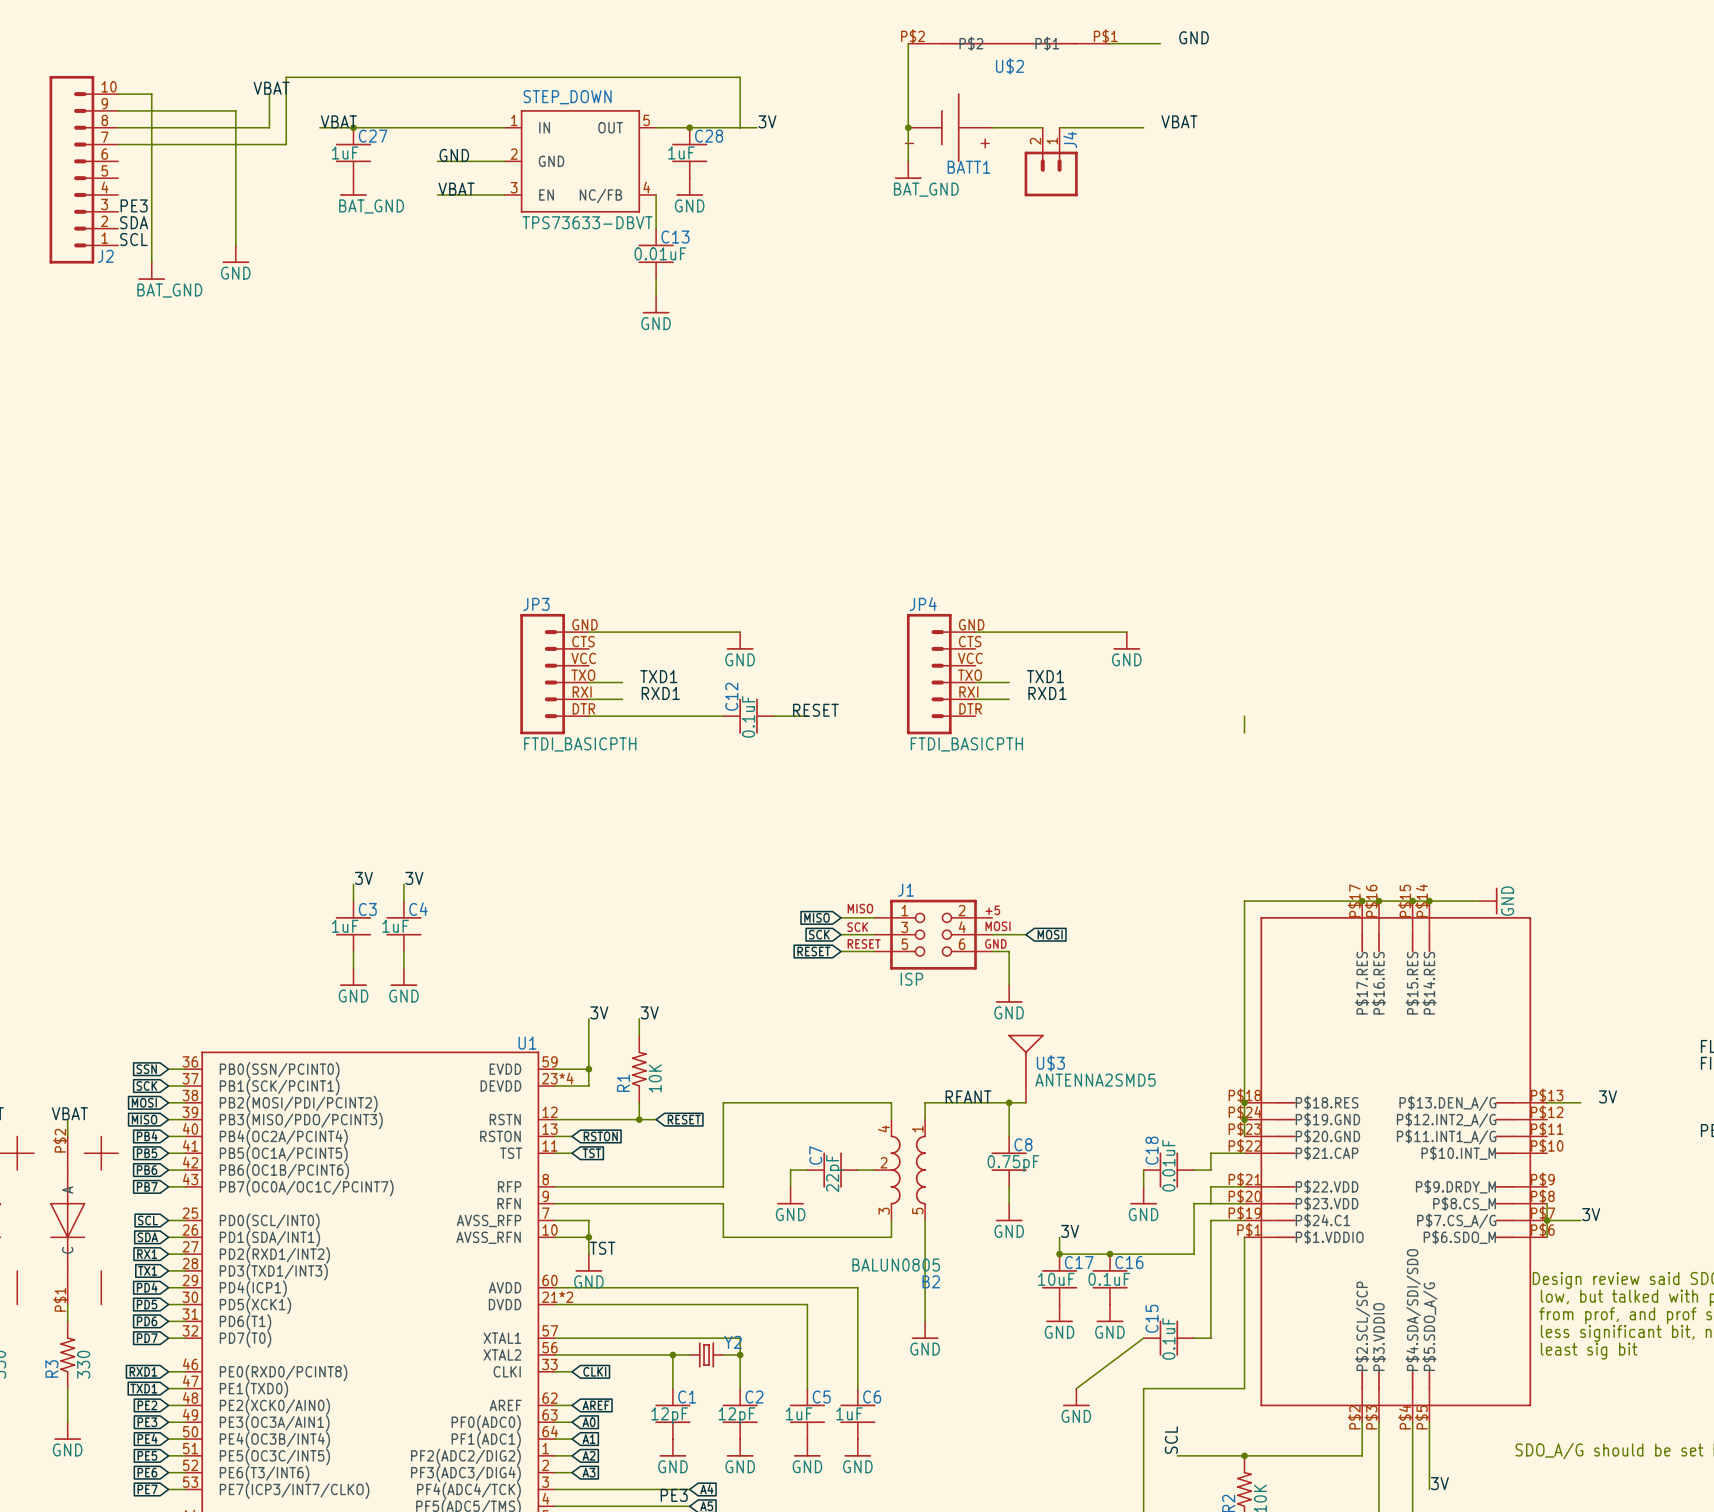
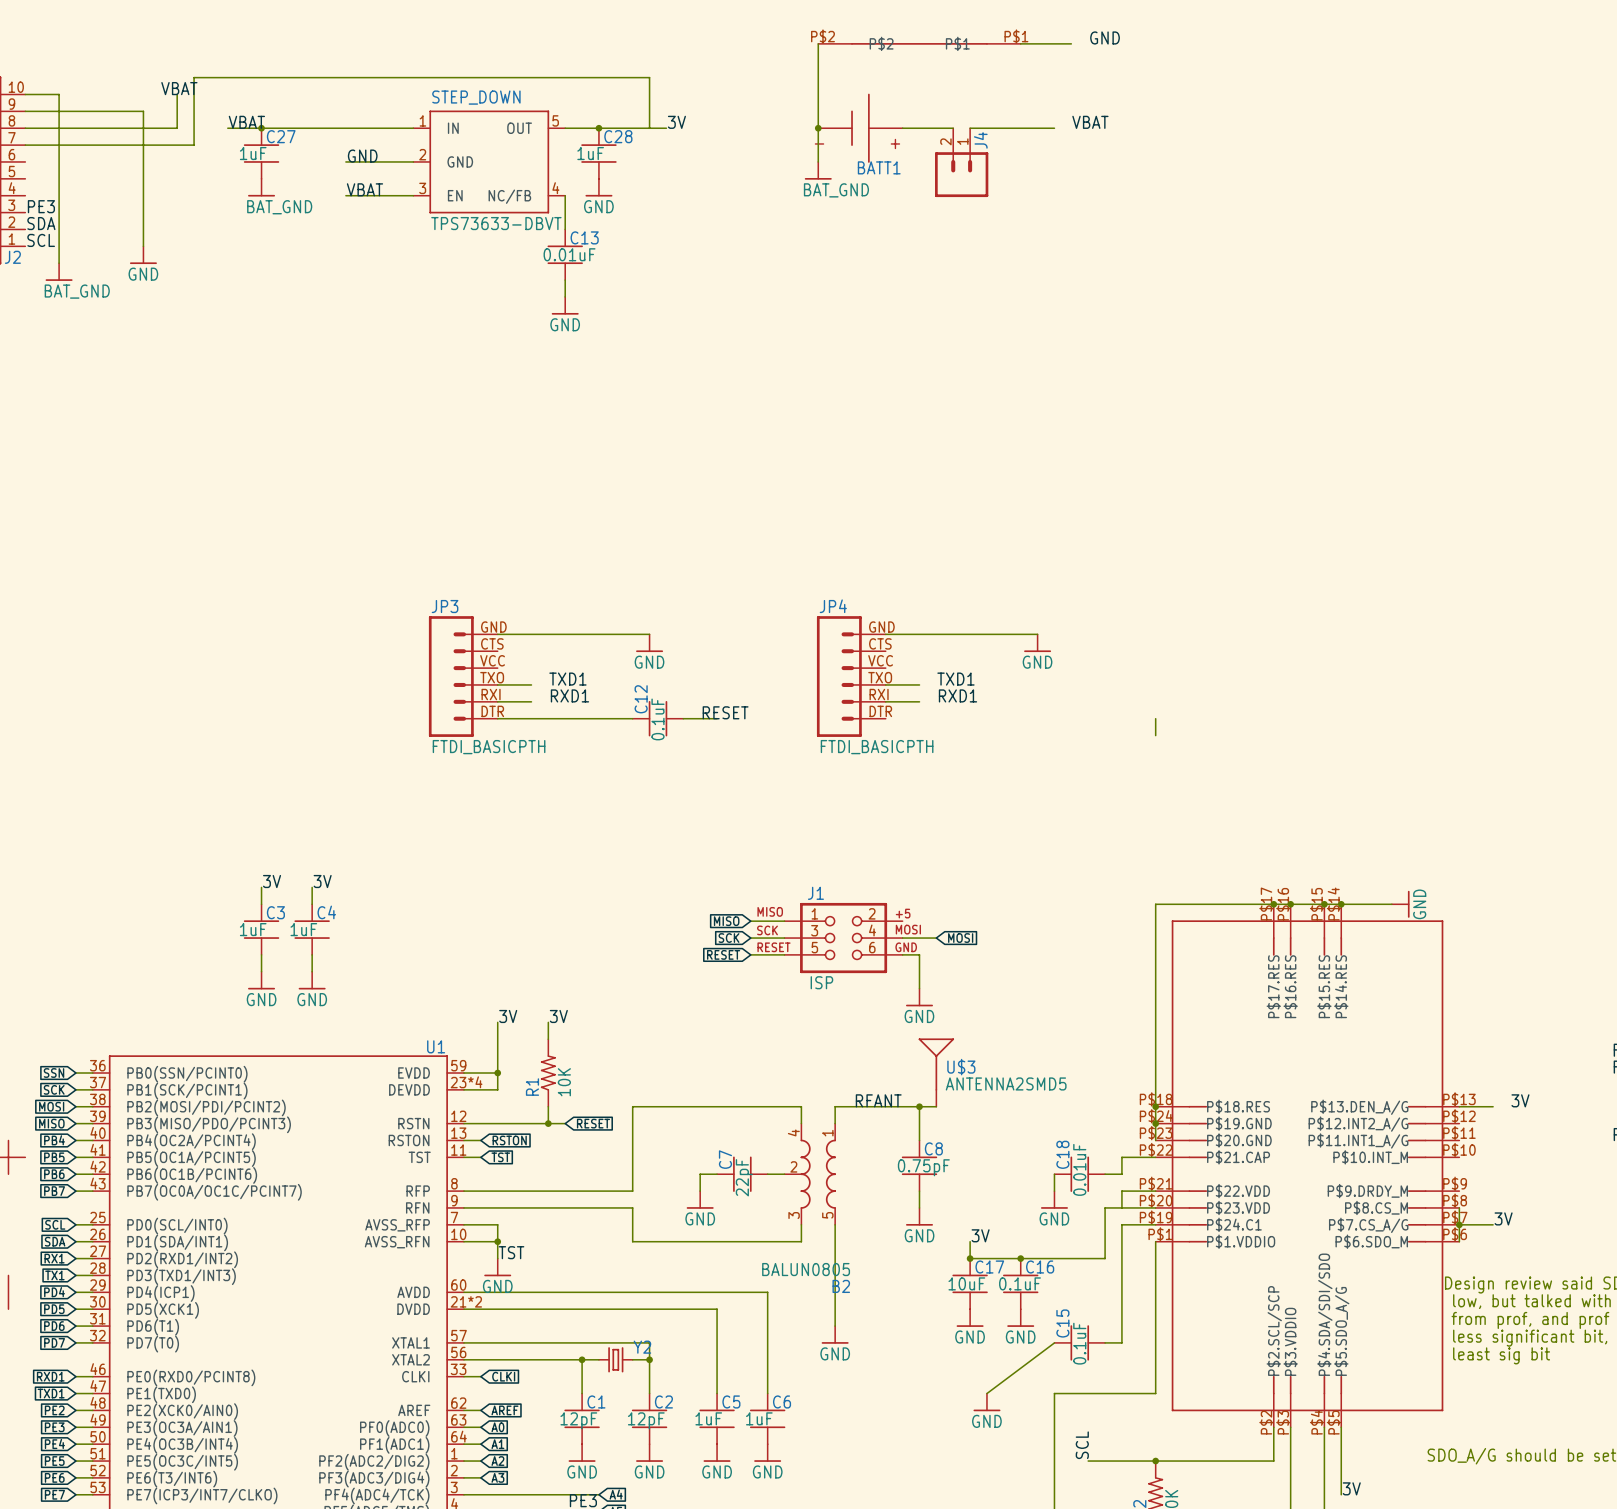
U$2 name: U$2 (1009, 66) -> none

